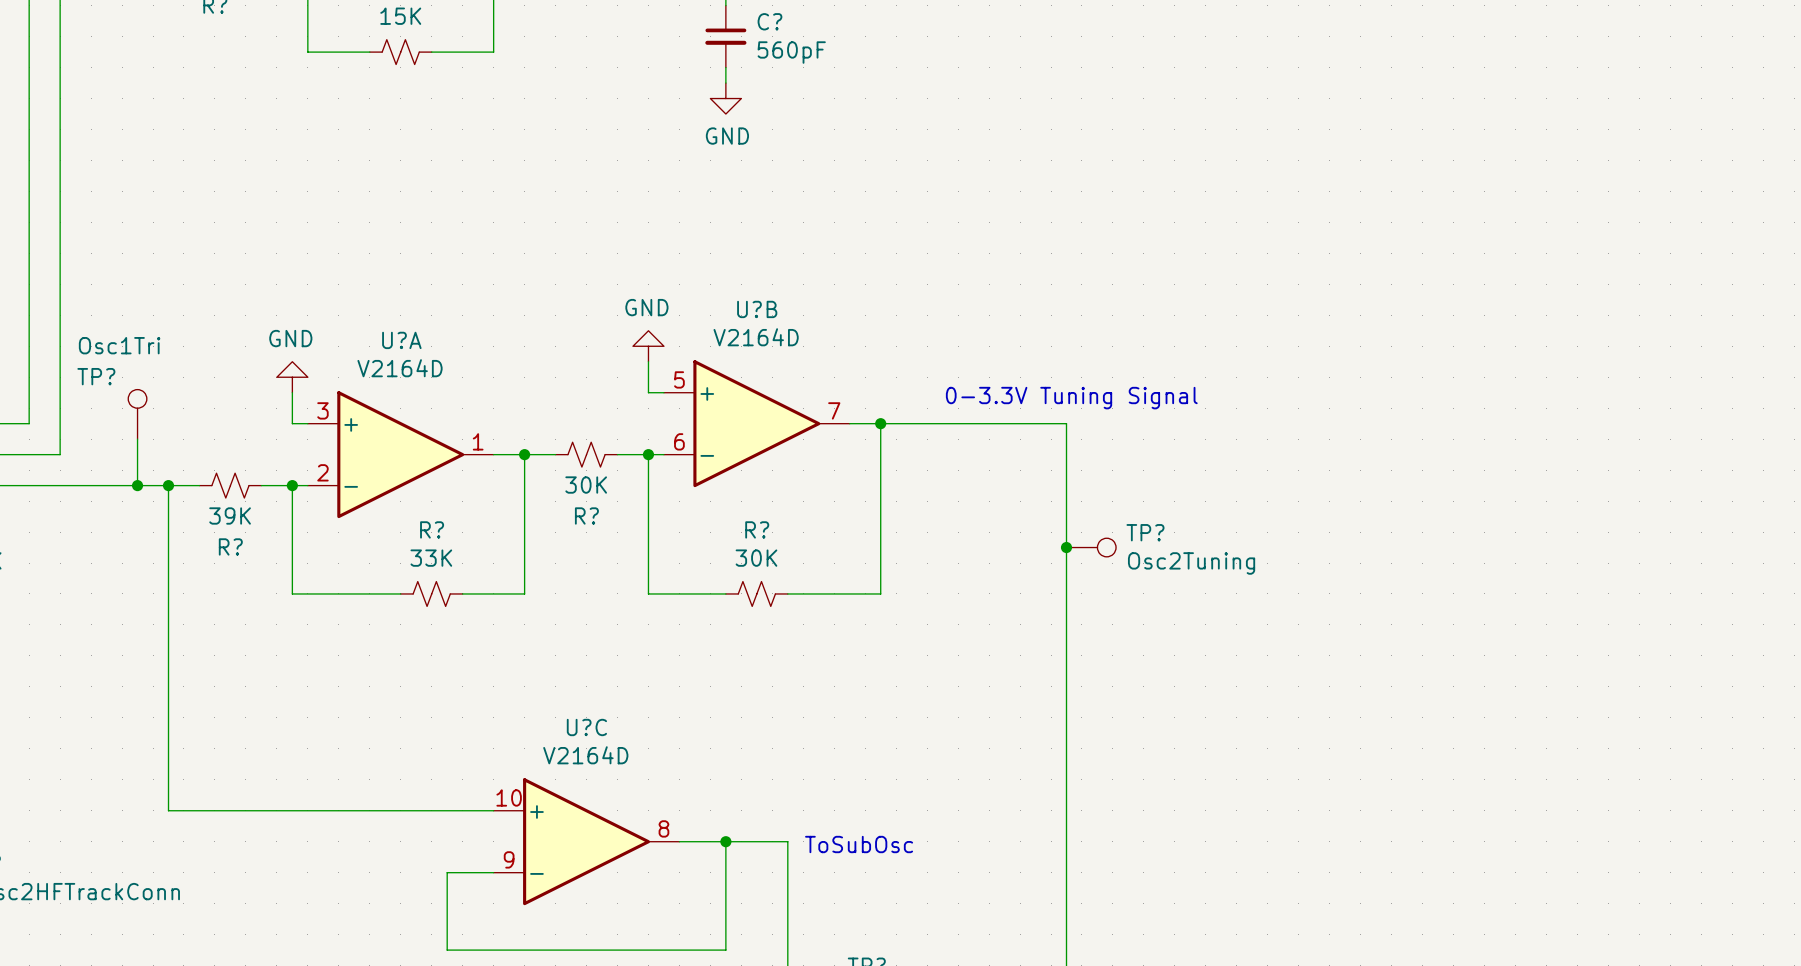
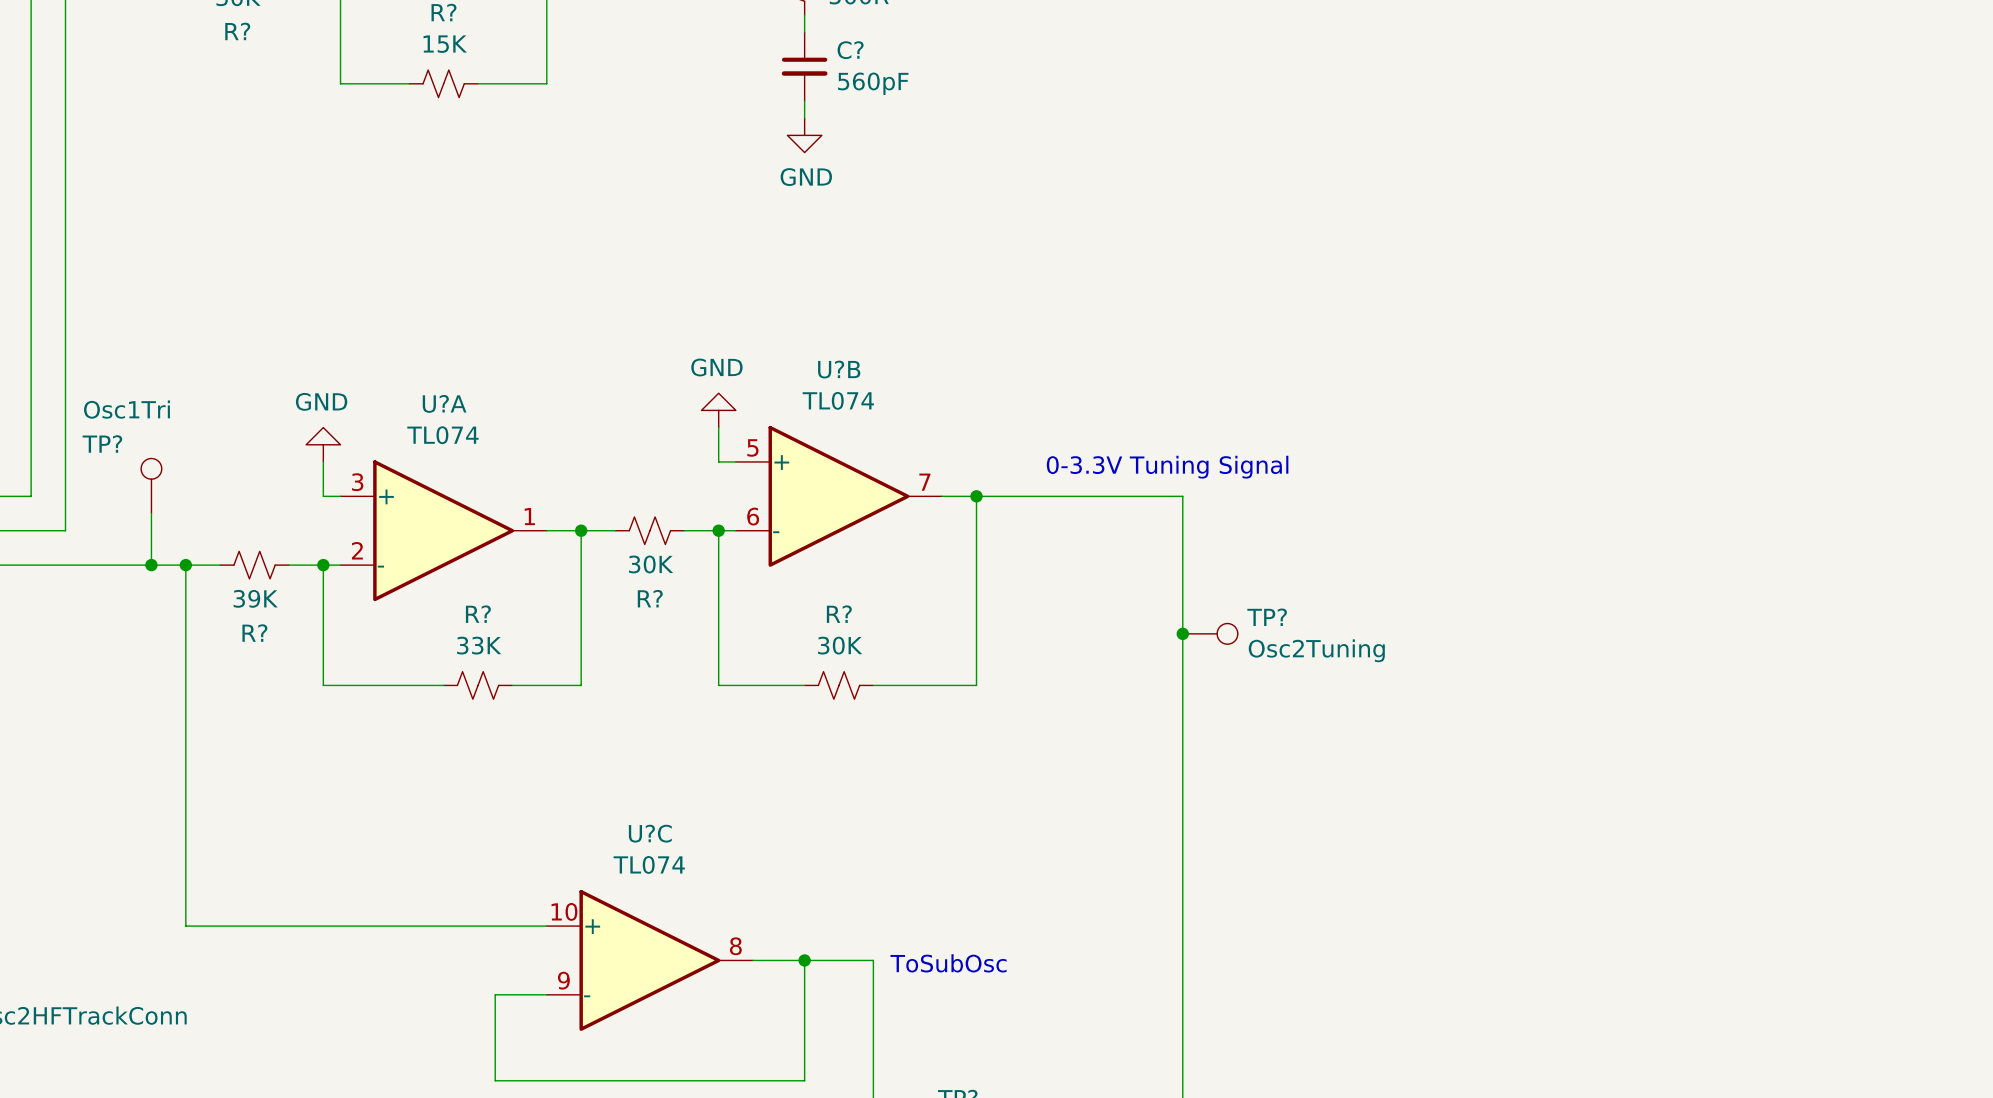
U?B value: V2164D (756, 337) -> TL074 (838, 400)
U?A value: V2164D (400, 368) -> TL074 (442, 435)
U?C value: V2164D (585, 755) -> TL074 (649, 864)

